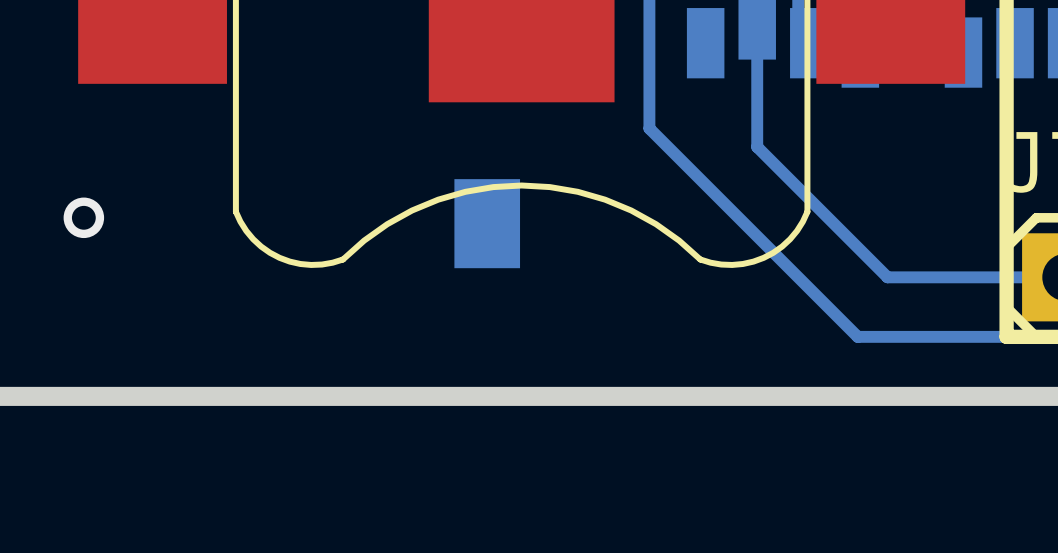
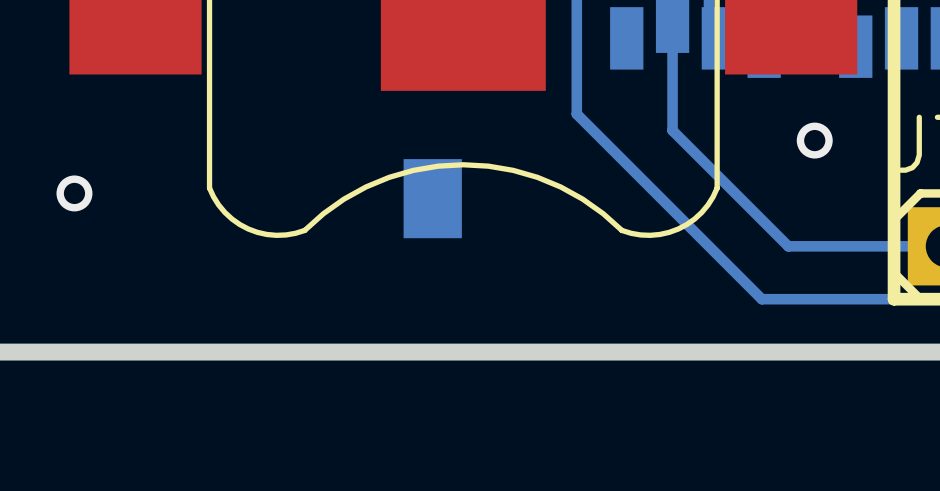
via: none -> (814, 140)

